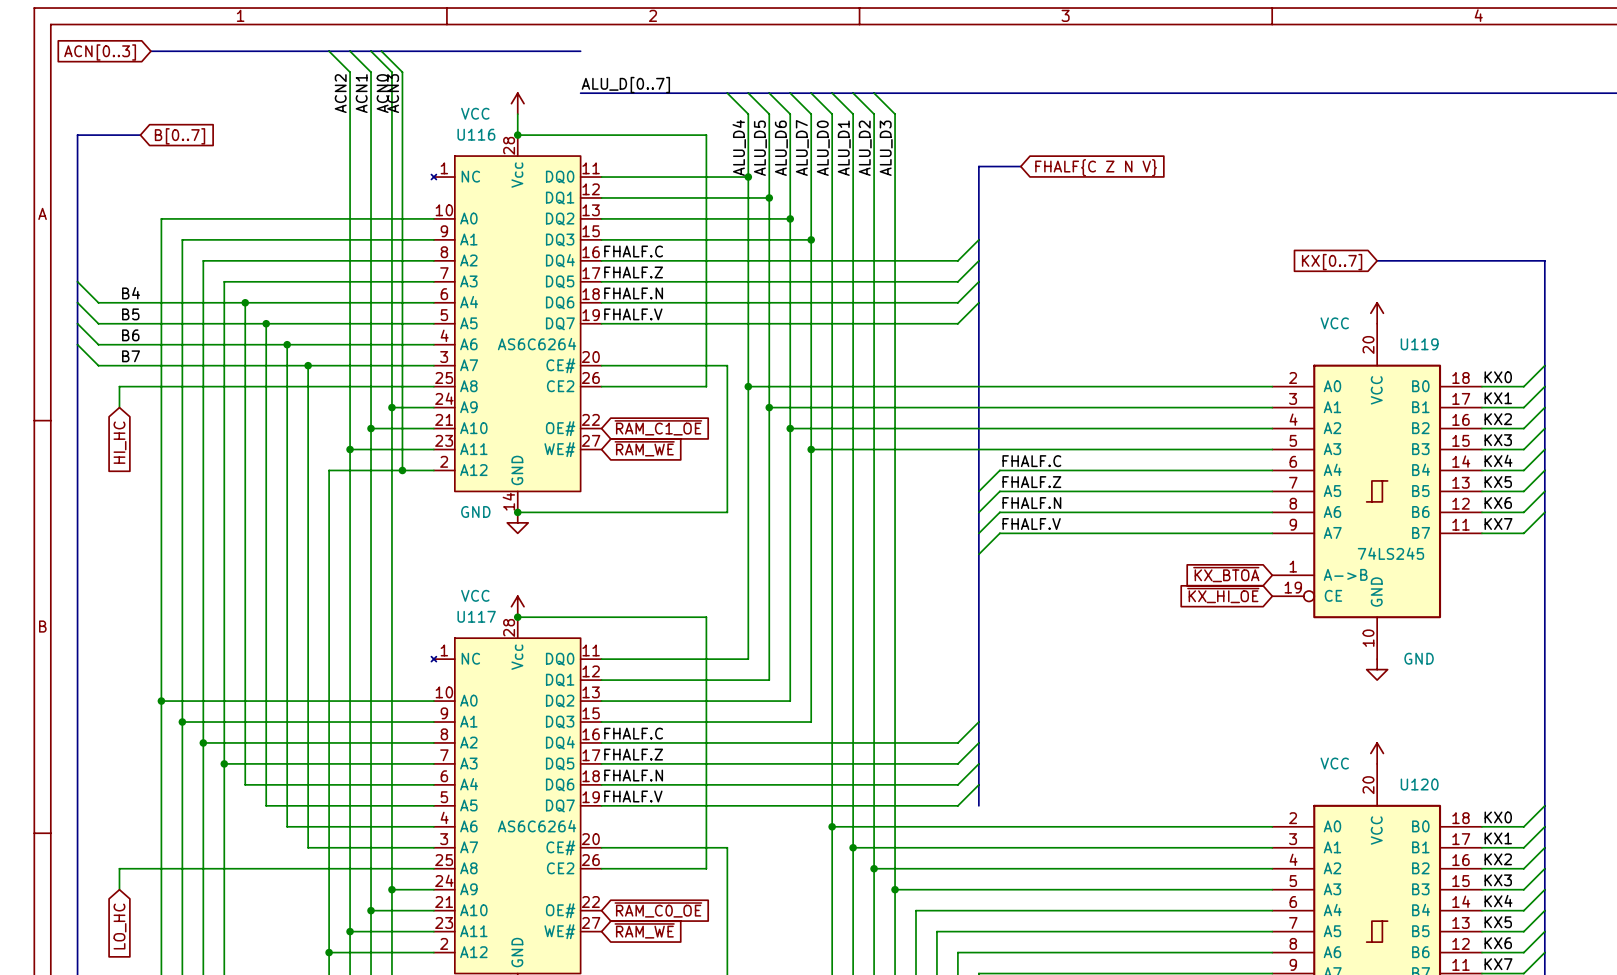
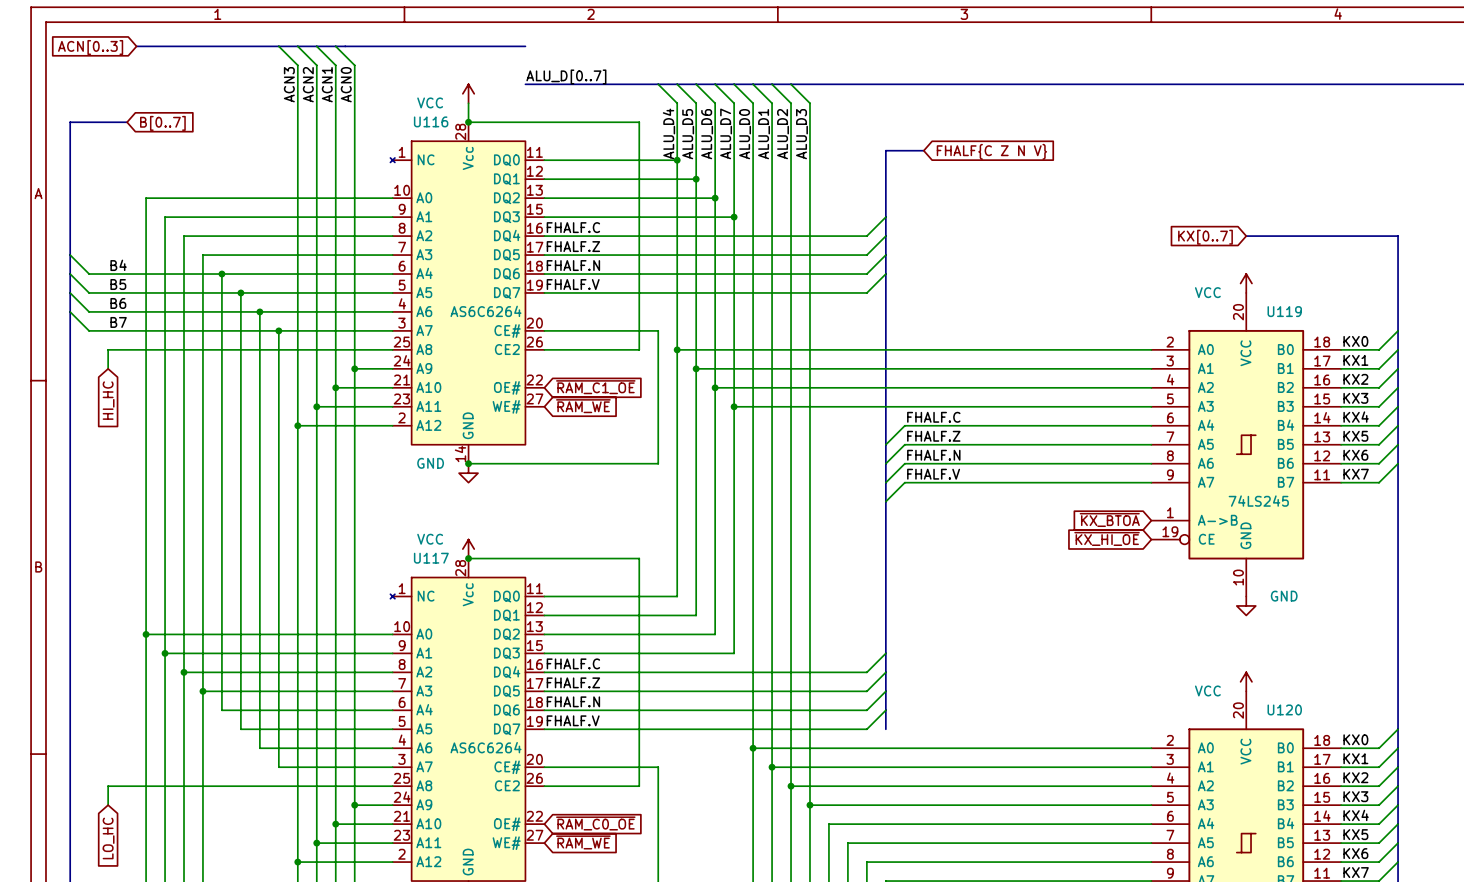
wire: (381, 51) (402, 72) (402, 470) -> (278, 46) (297, 65) (297, 425)
label position: ACN3 (393, 93) -> ACN3 (289, 84)
junction: none -> (297, 425)
junction: (402, 470) -> none

